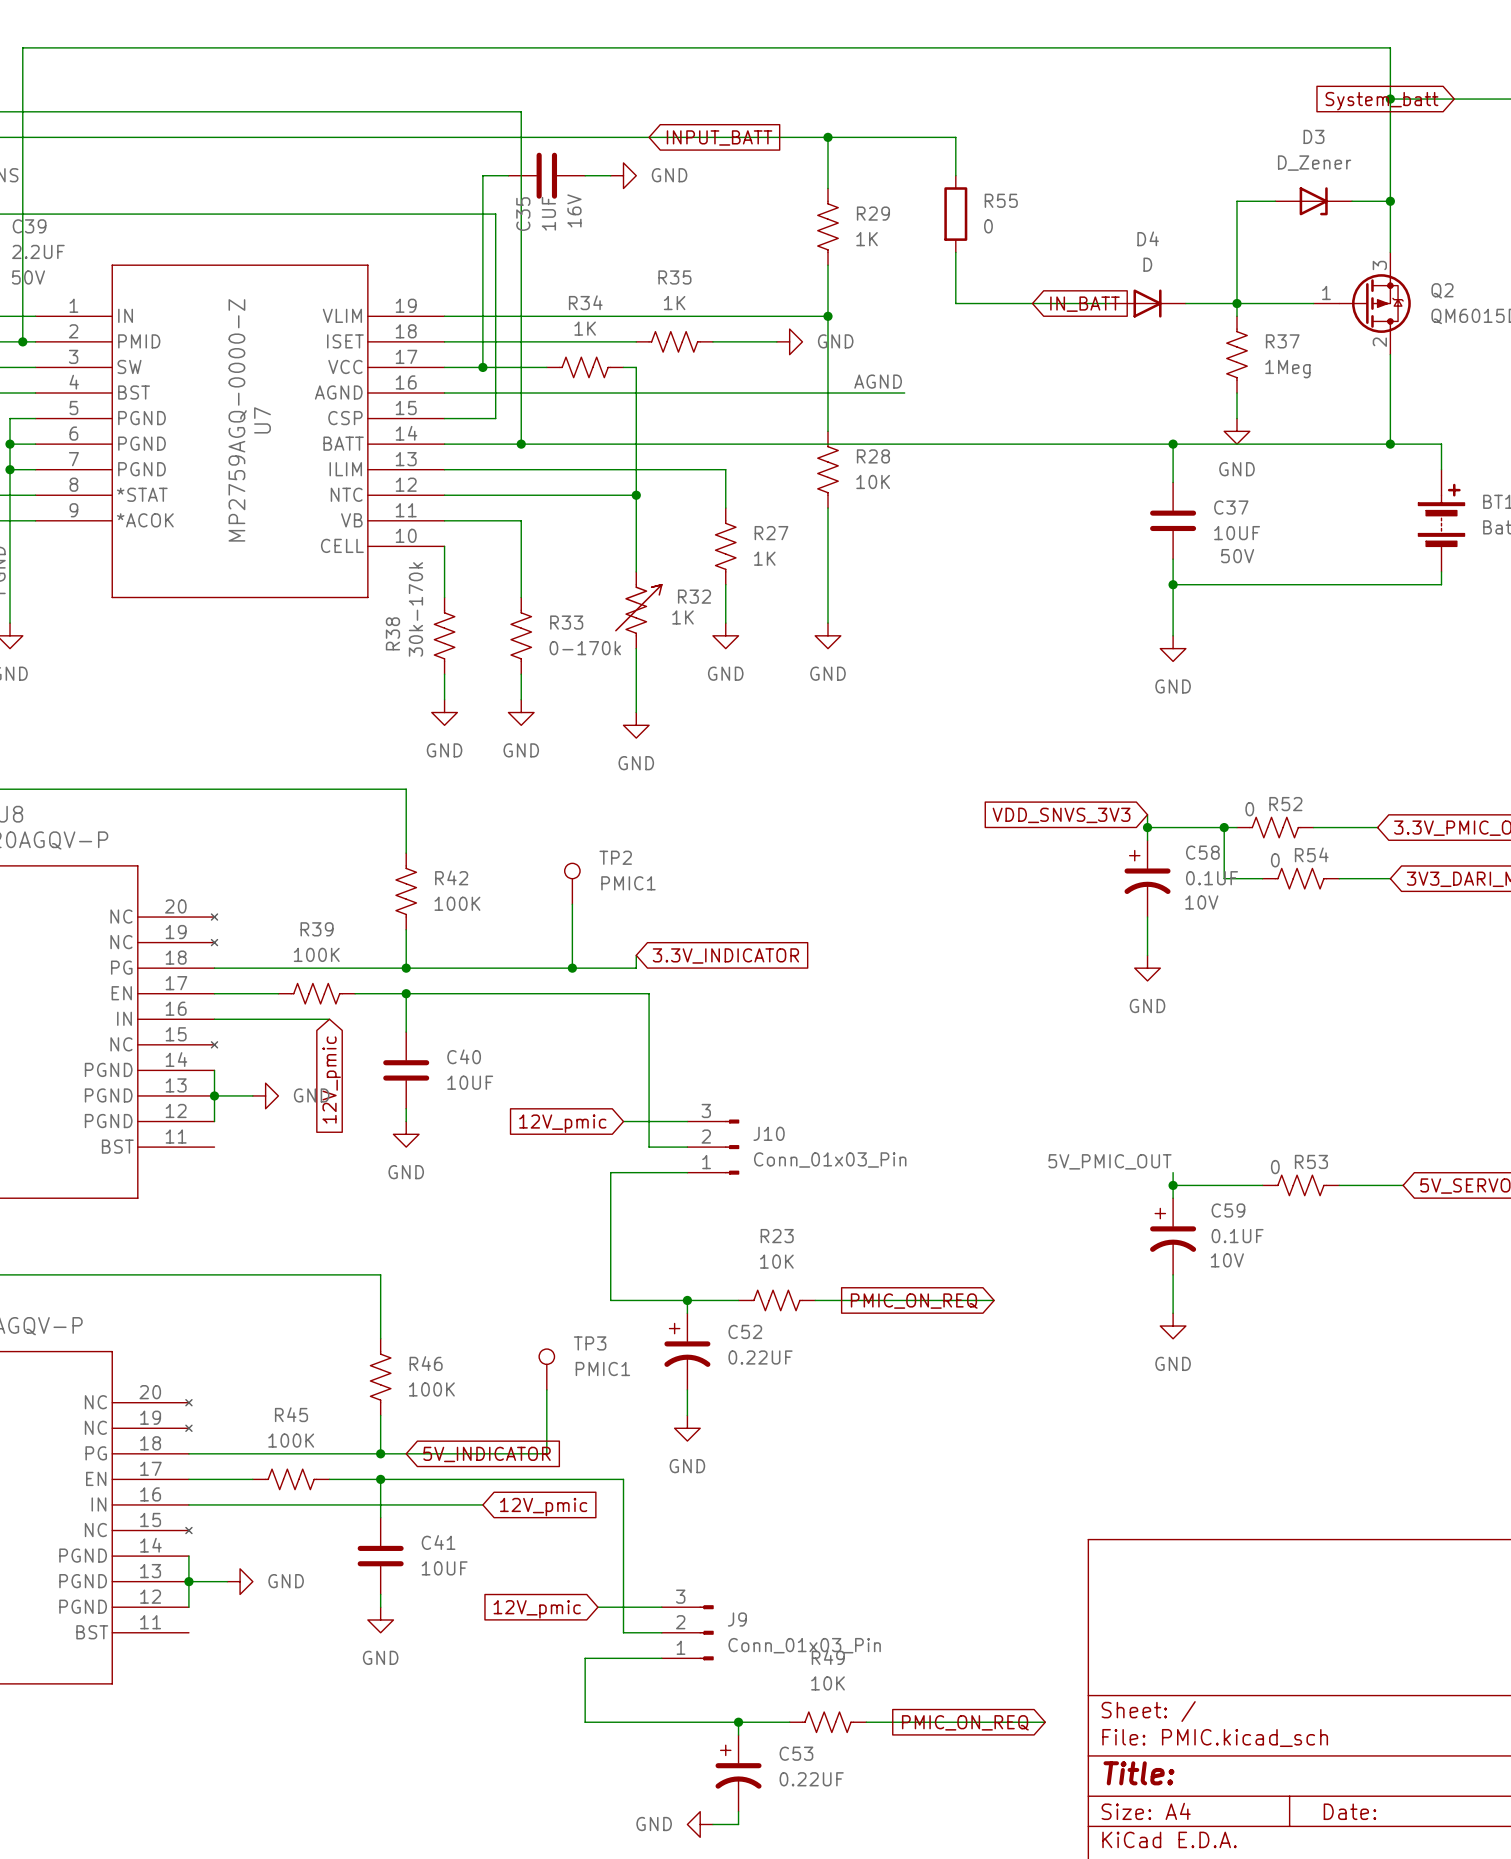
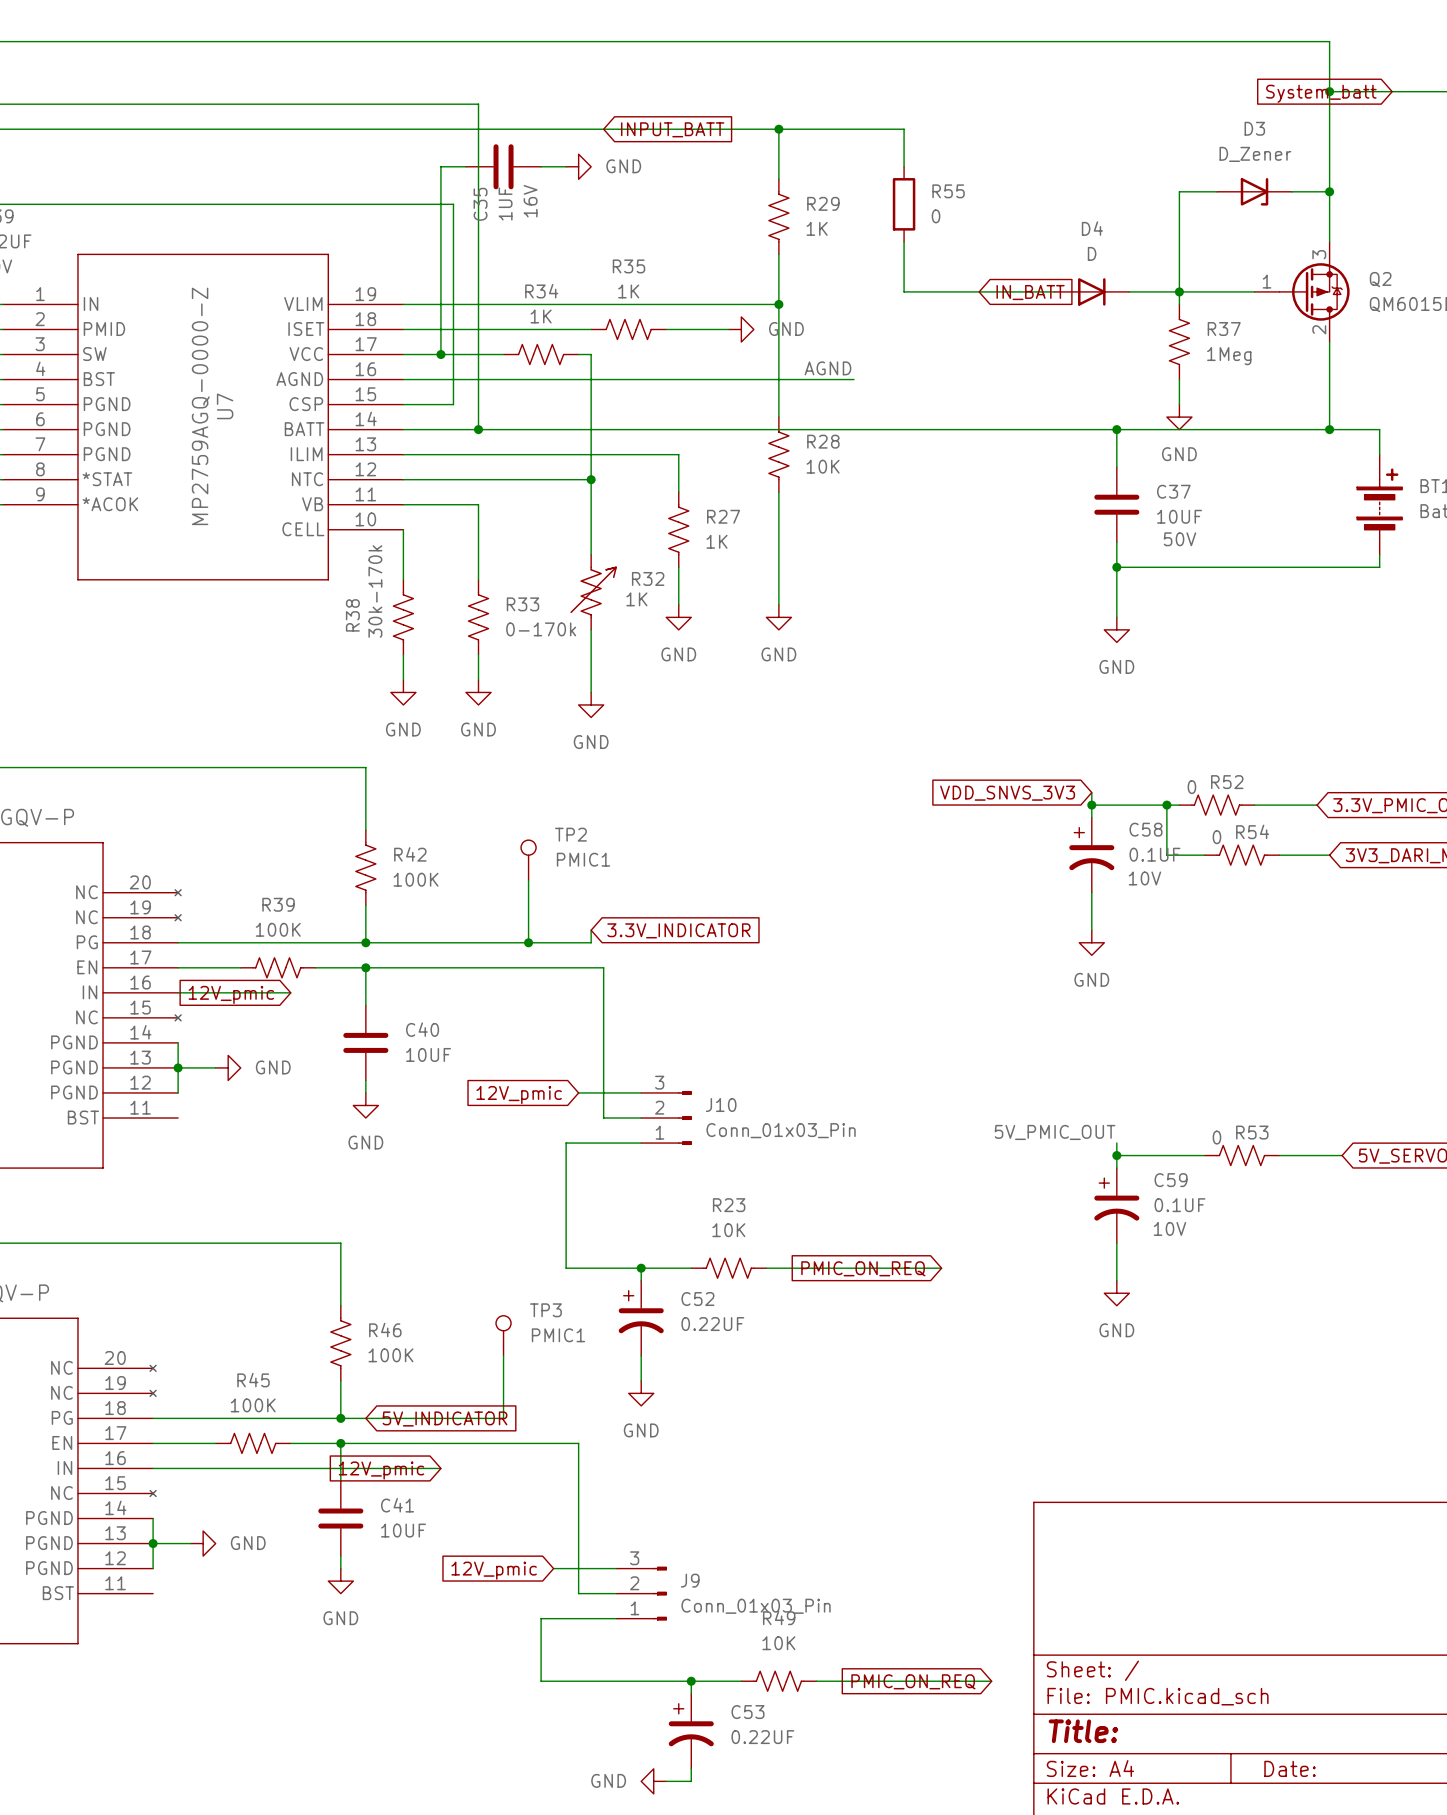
global label rotation: 0° (331, 1080) -> 90° clockwise (231, 994)
global label rotation: 0° (543, 1507) -> 180° (381, 1470)

